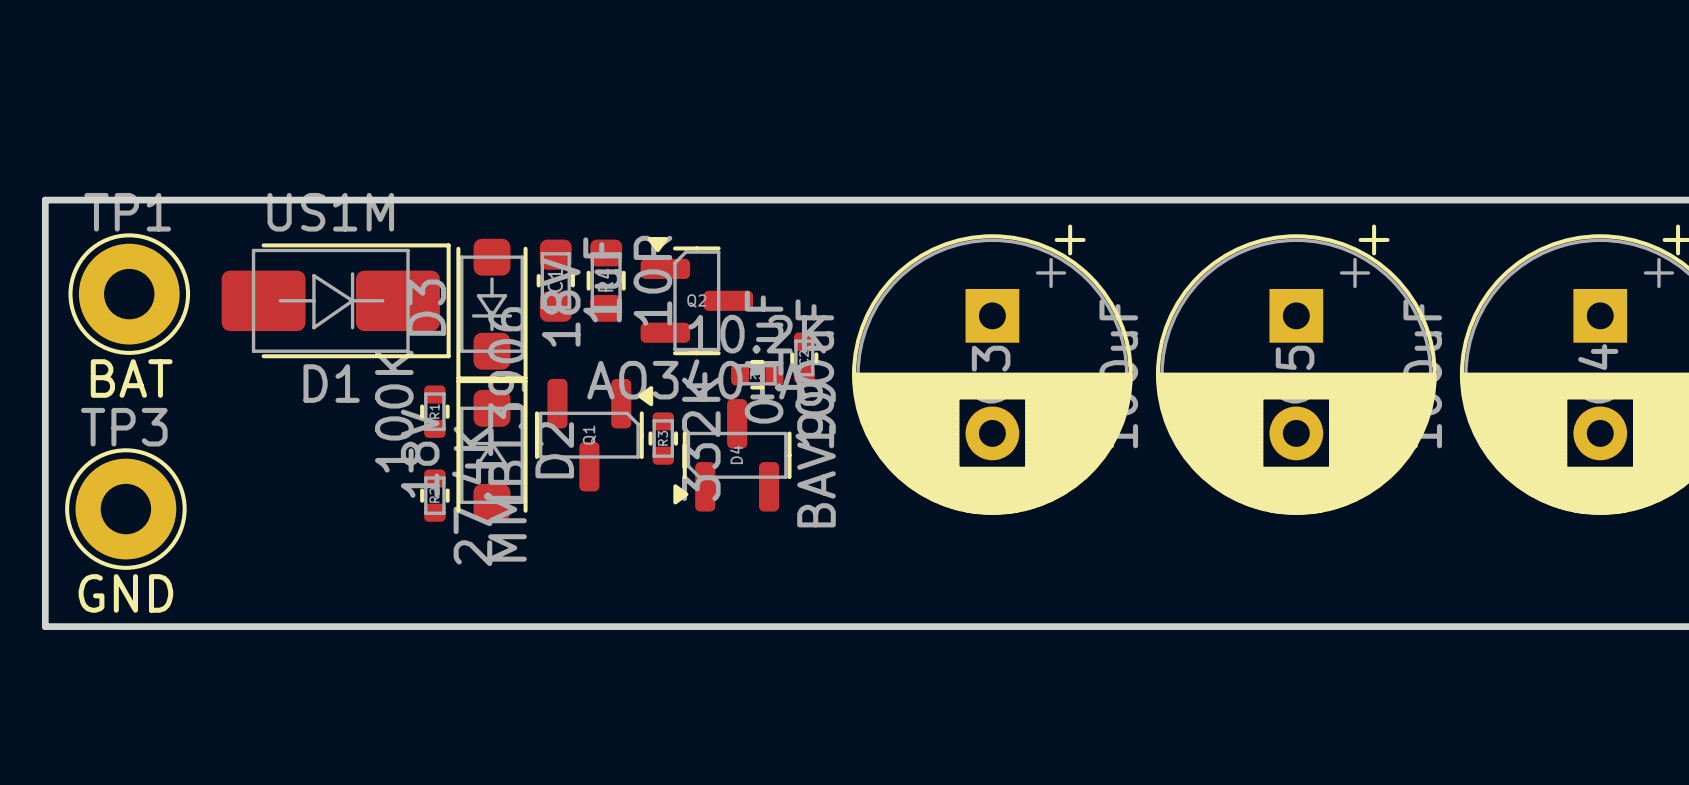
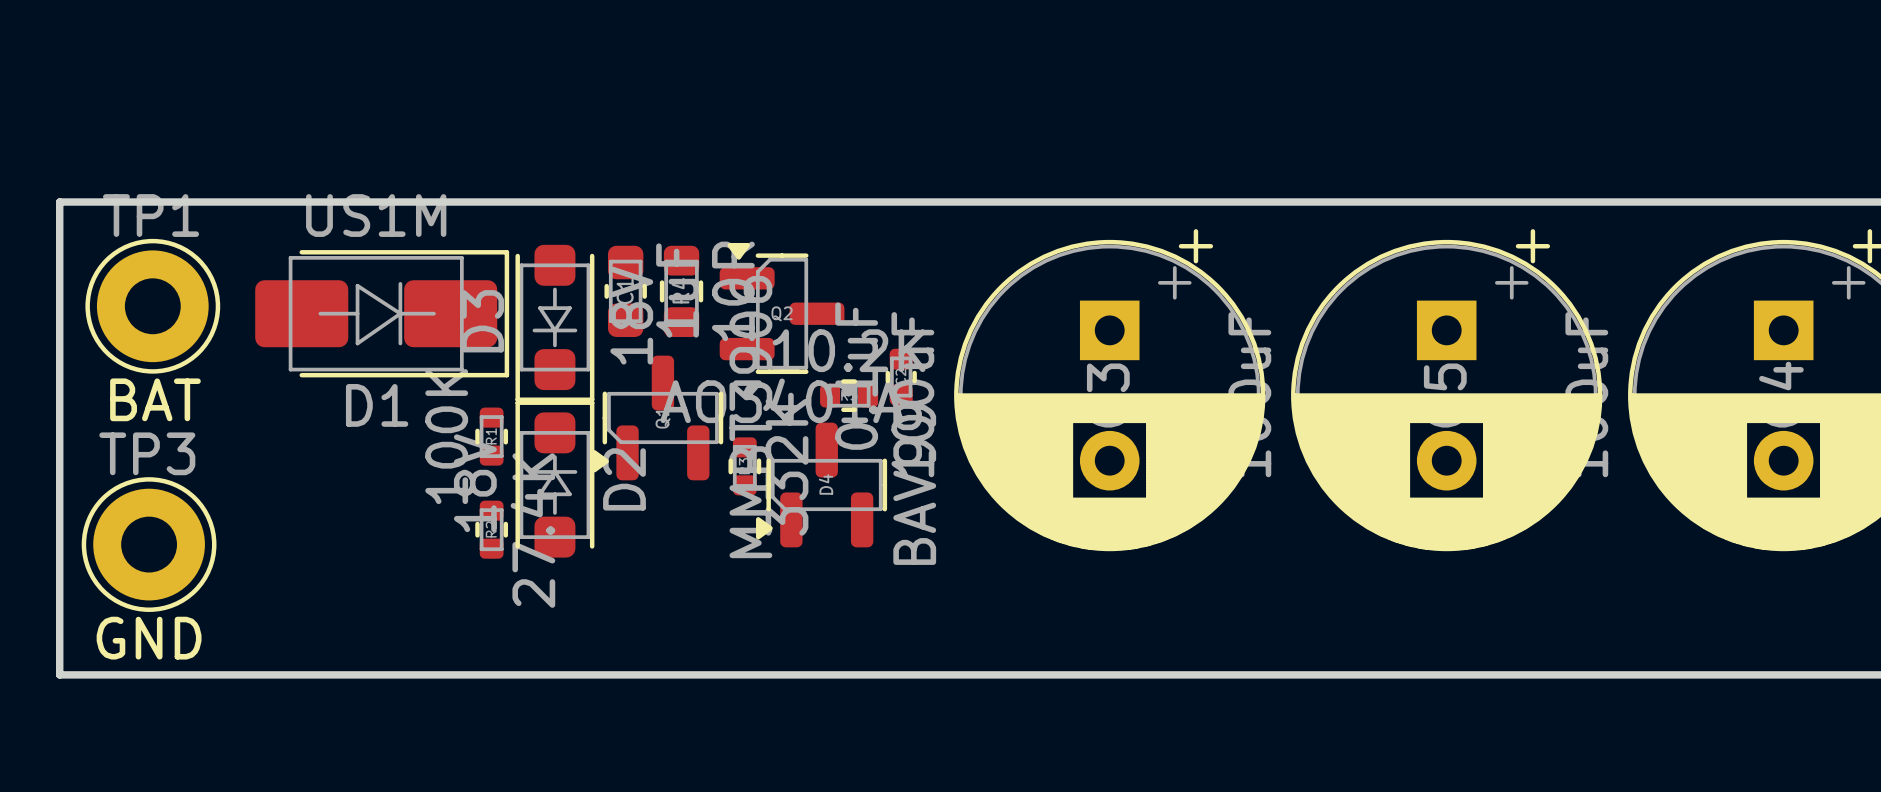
Q1 rotation: 0° (594, 435) -> 180° (657, 417)

